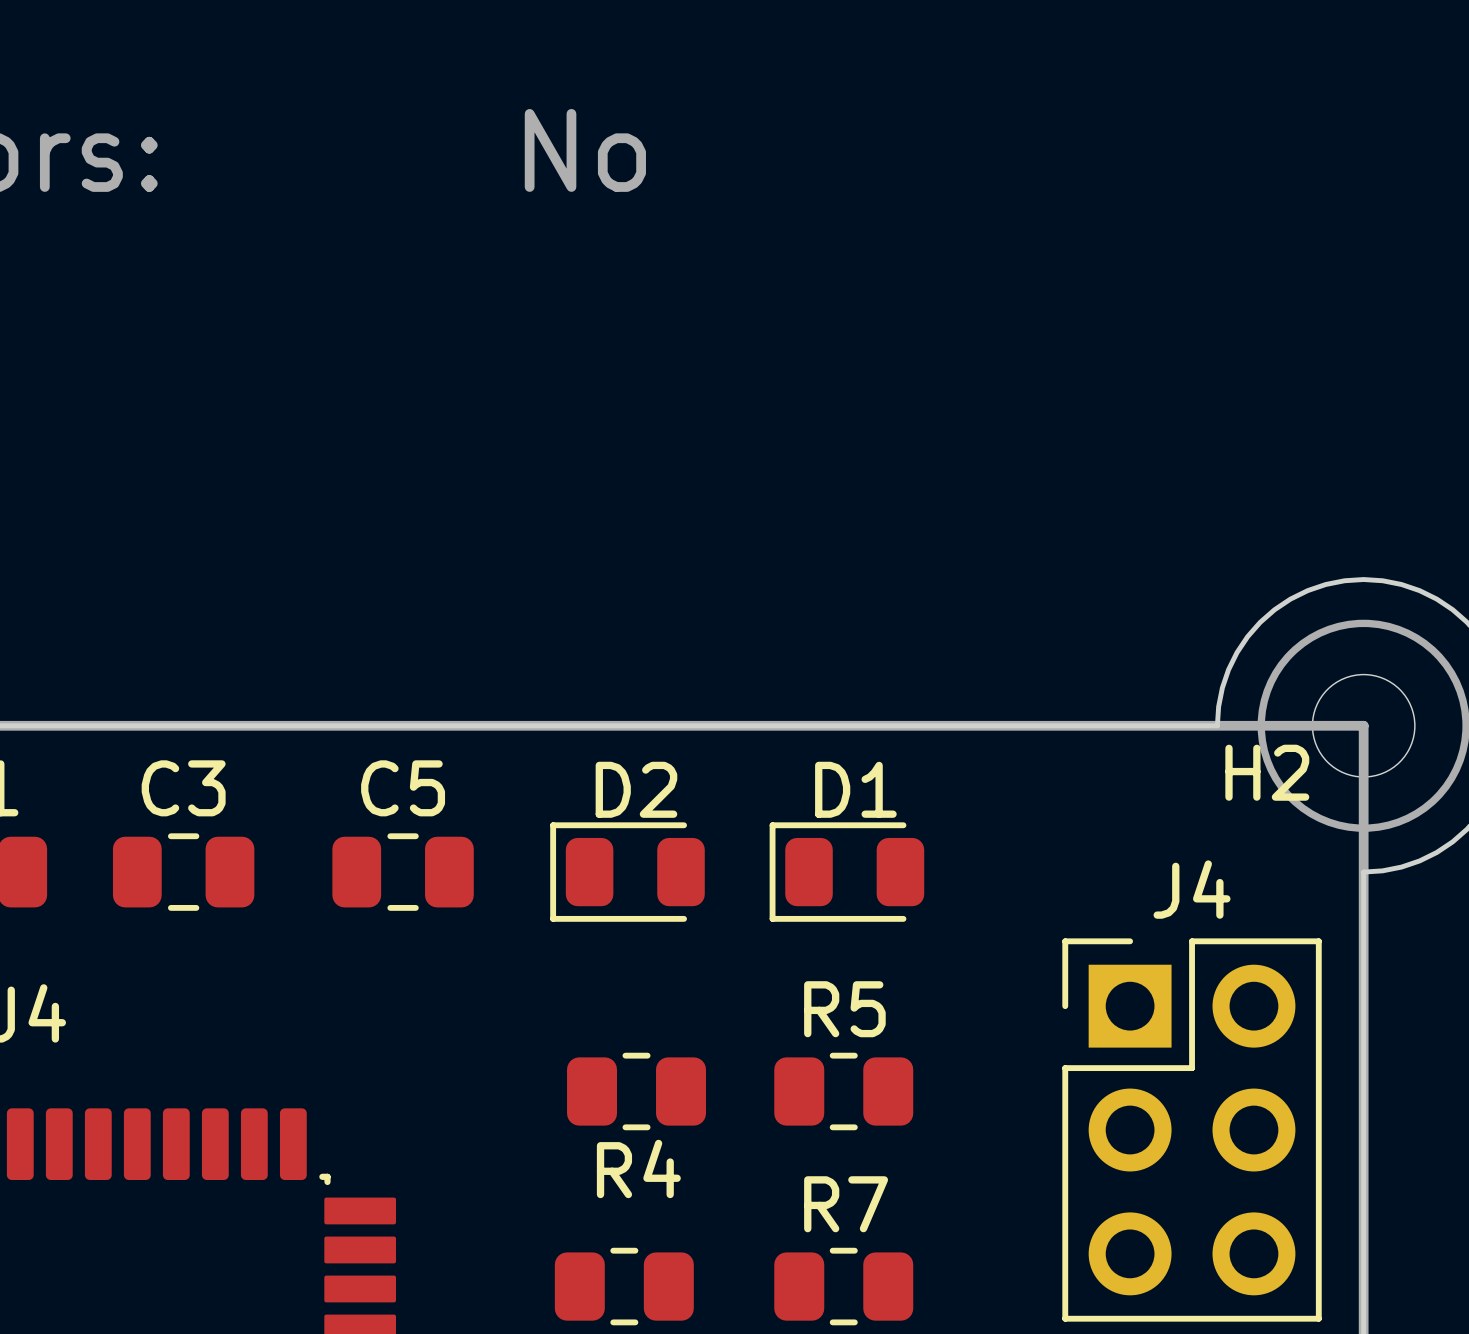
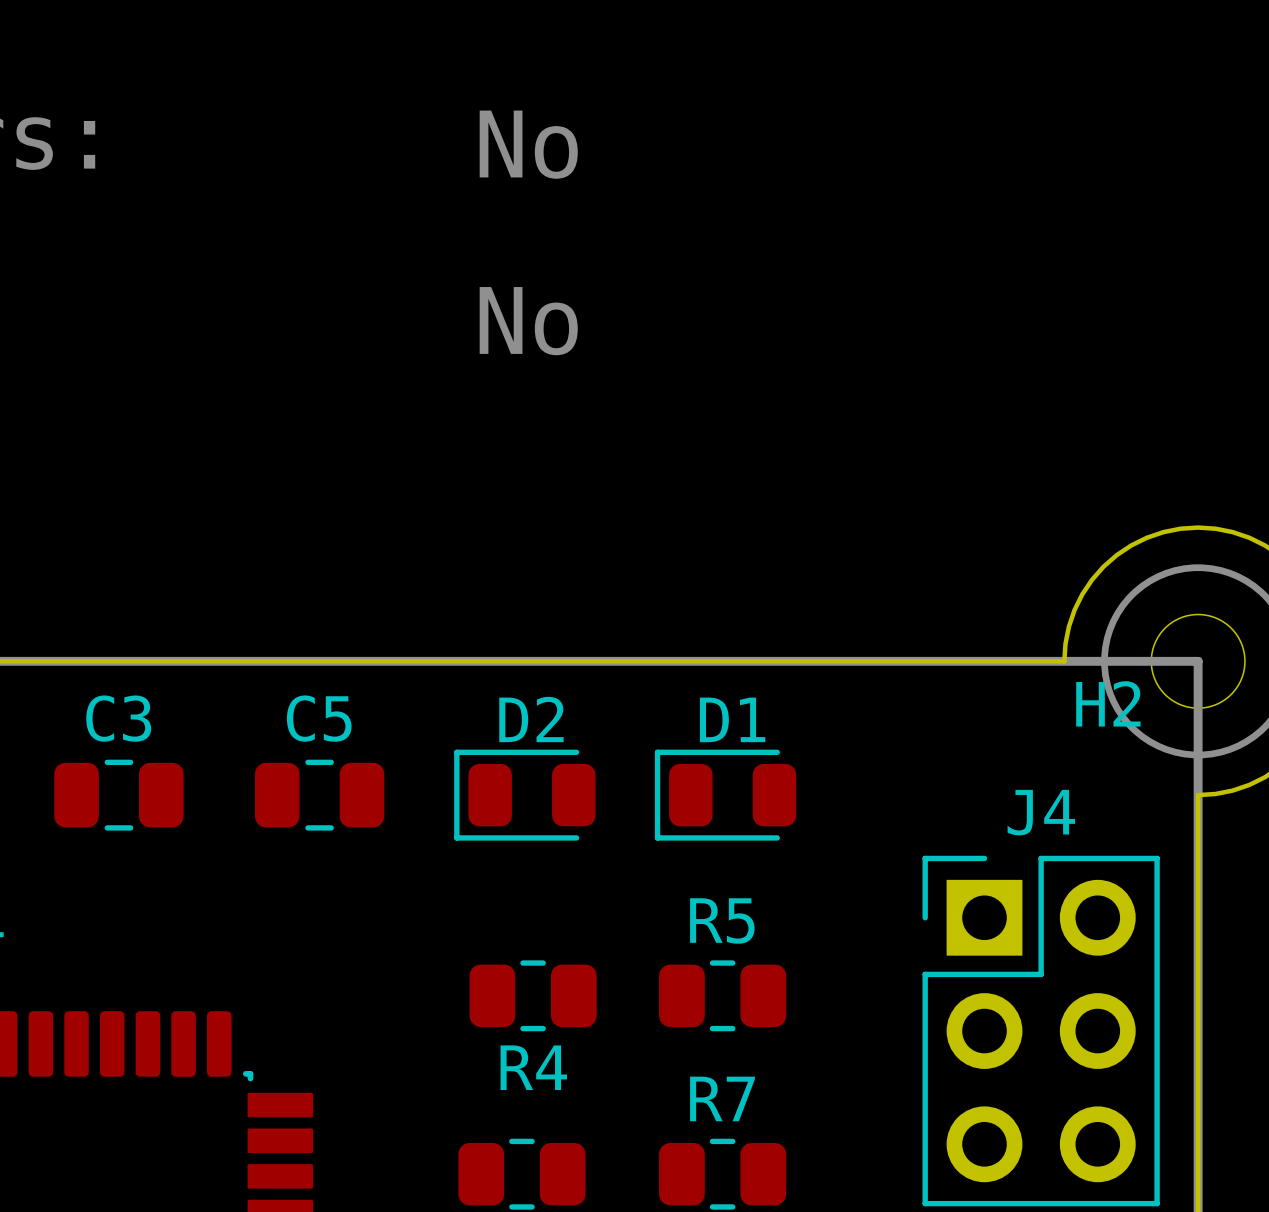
text position: No (585, 150) -> No (528, 144)
text: none -> No (528, 321)

